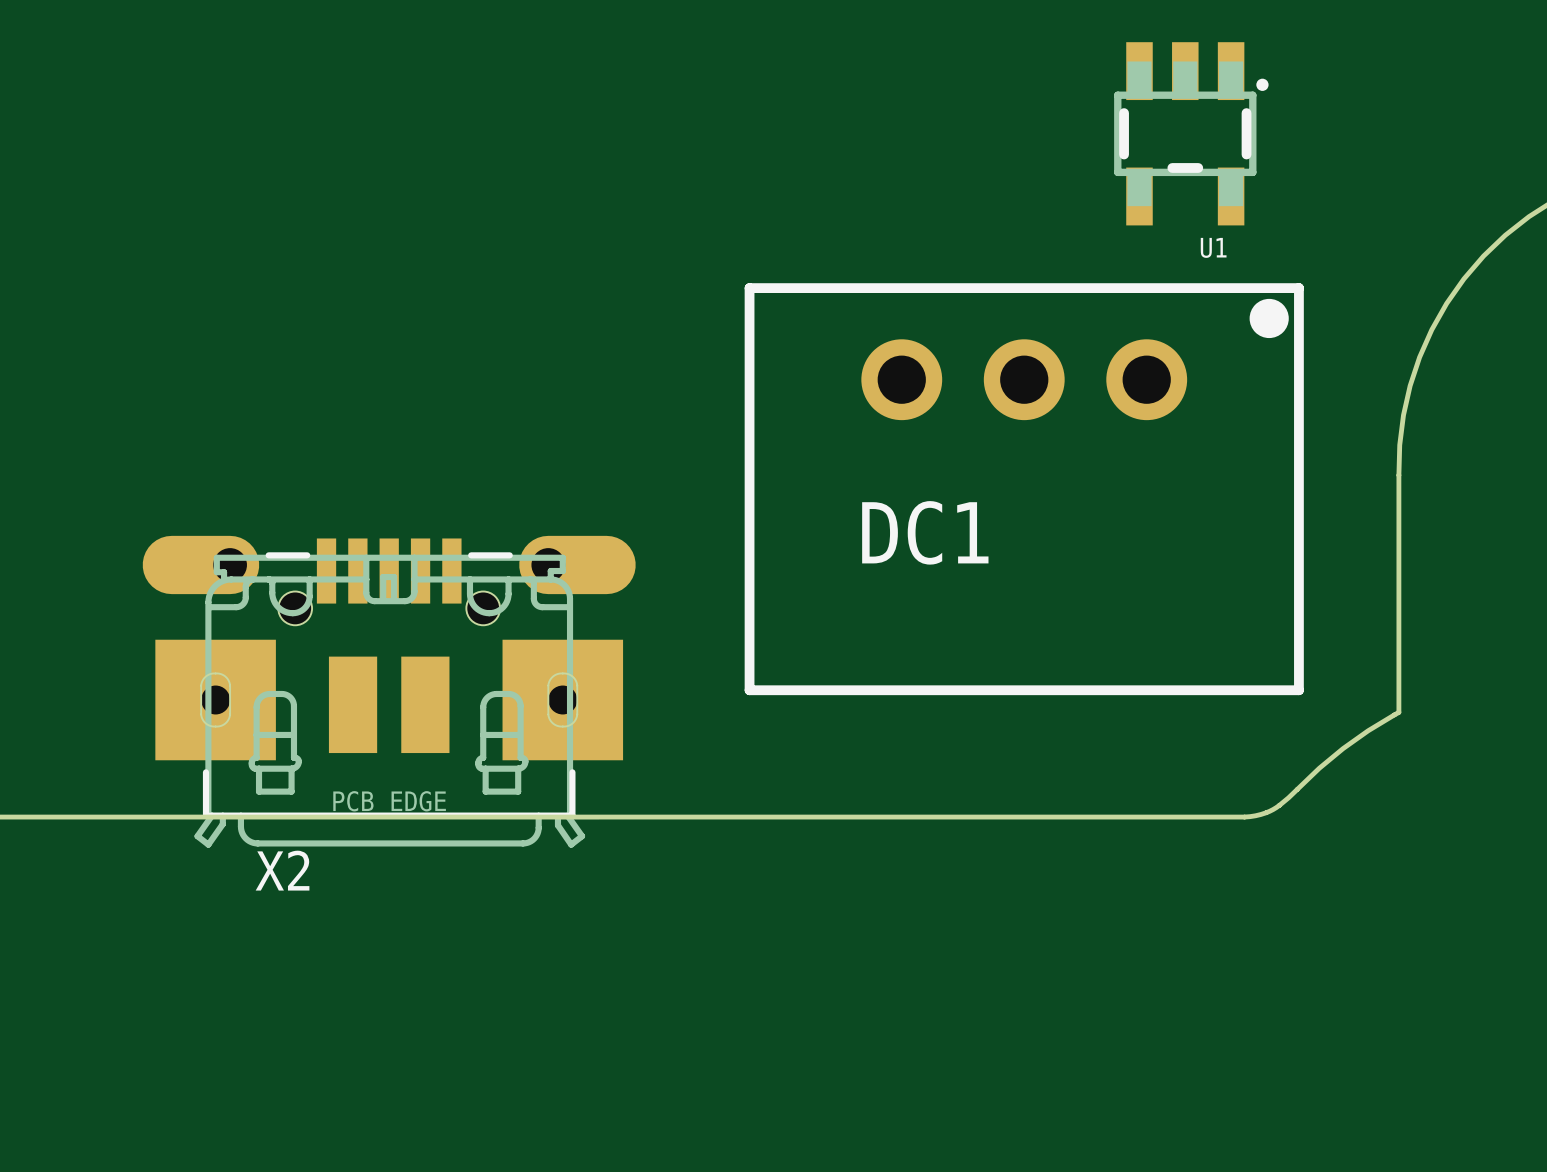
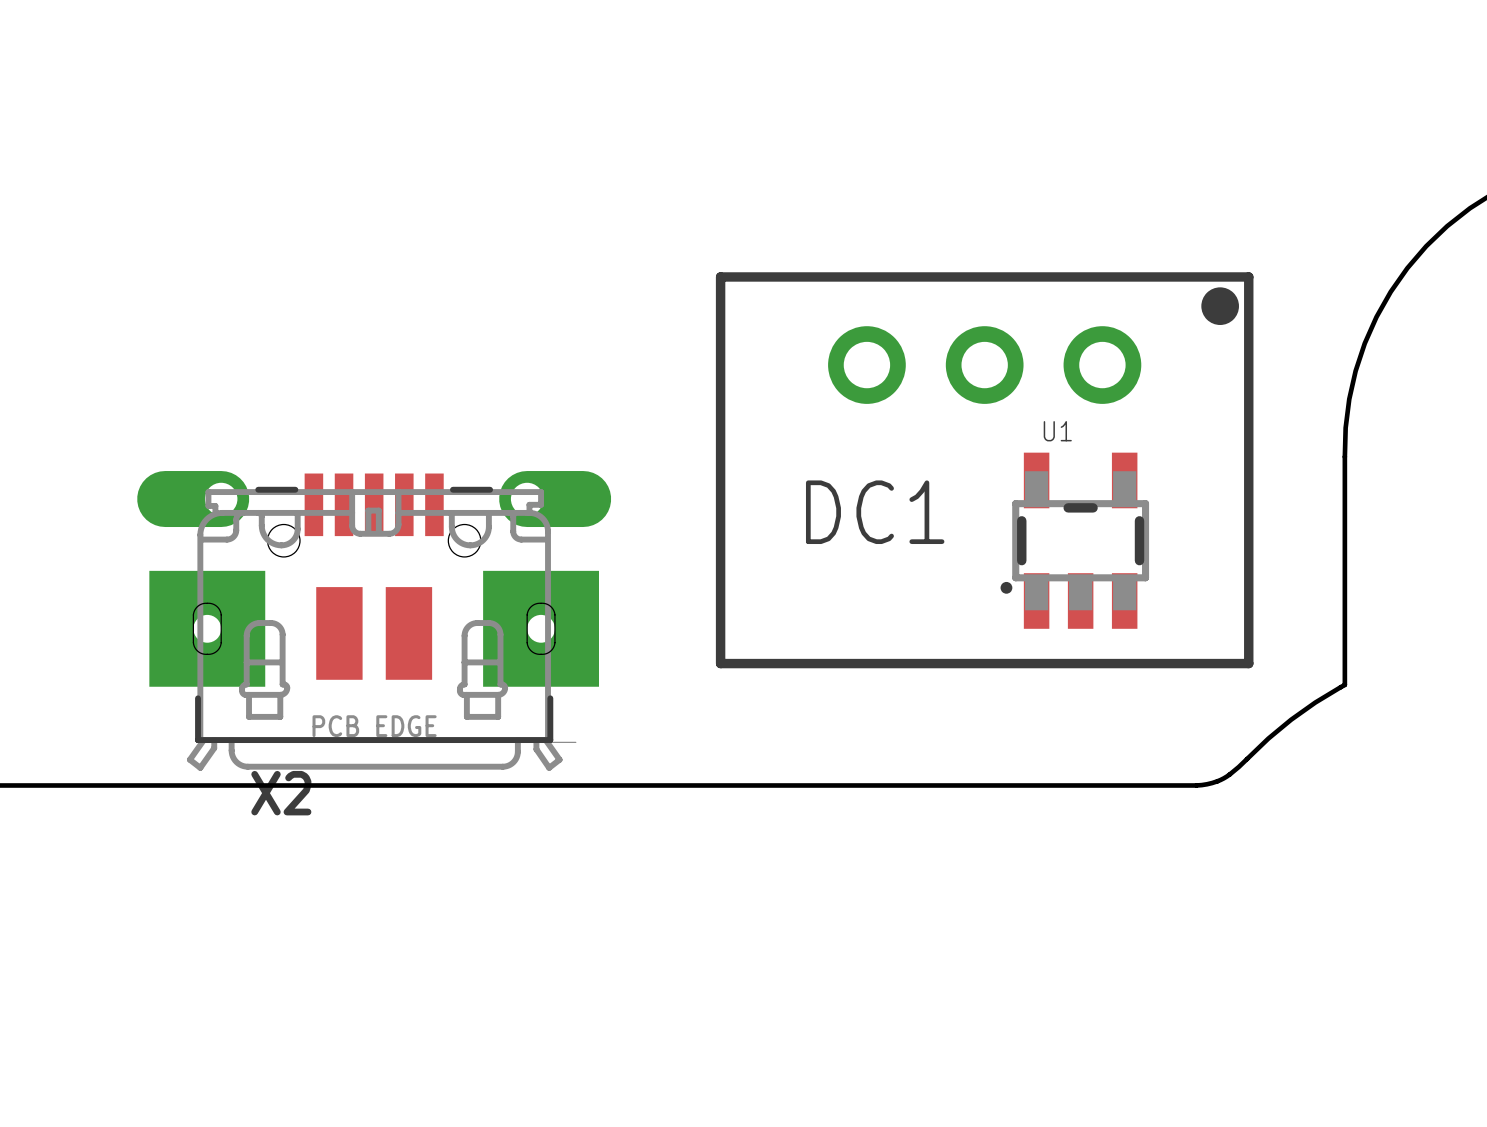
U1 rotation: 0° (1191, 133) -> 180° (1074, 540)
U1 position: (1191, 133) -> (1074, 540)
X2 position: (389, 691) -> (374, 620)

